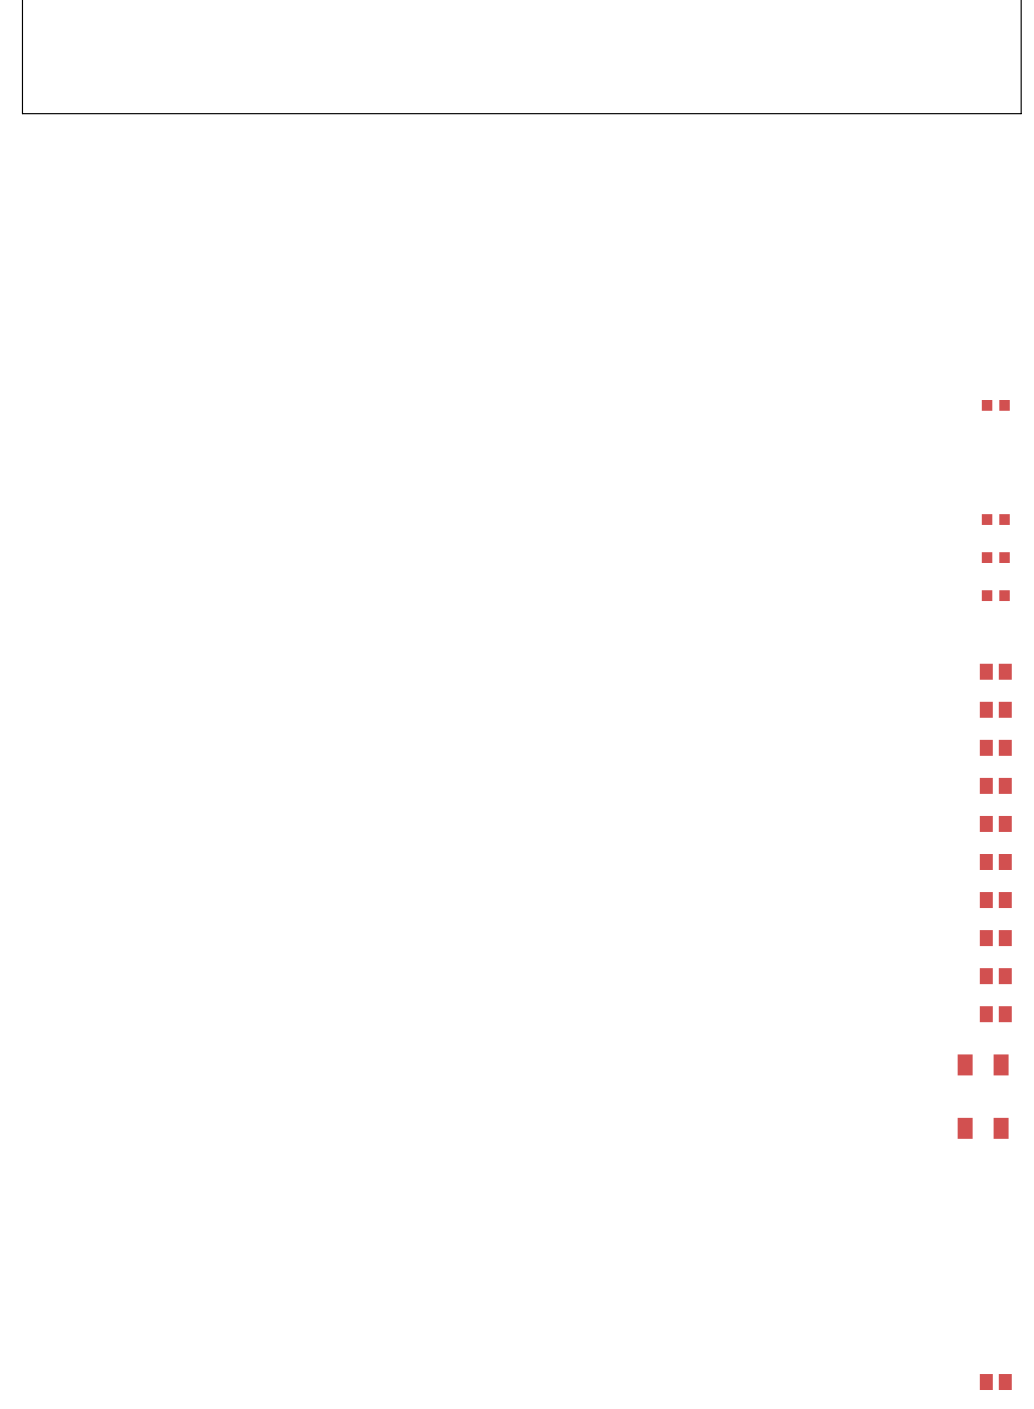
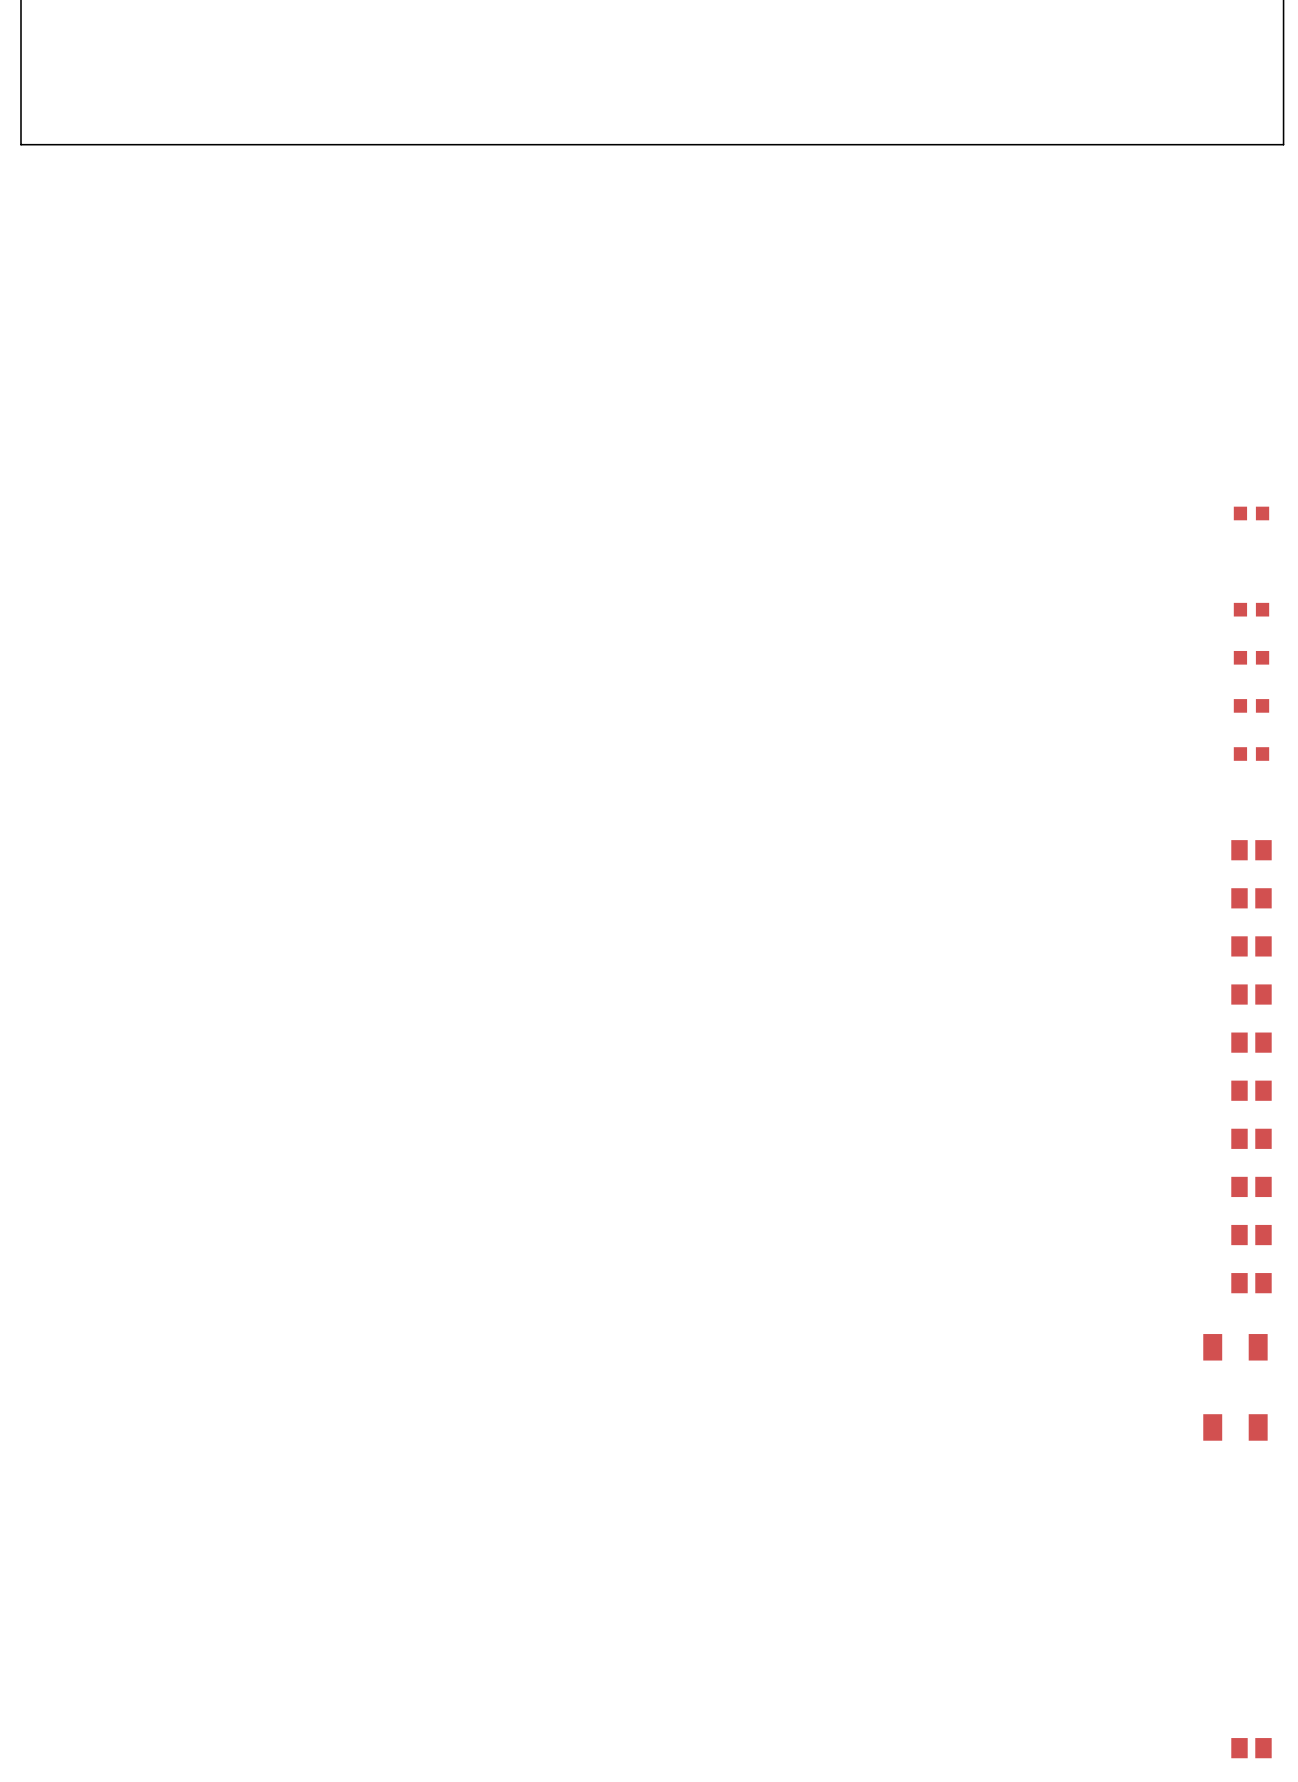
part: none -> (1251, 609)

